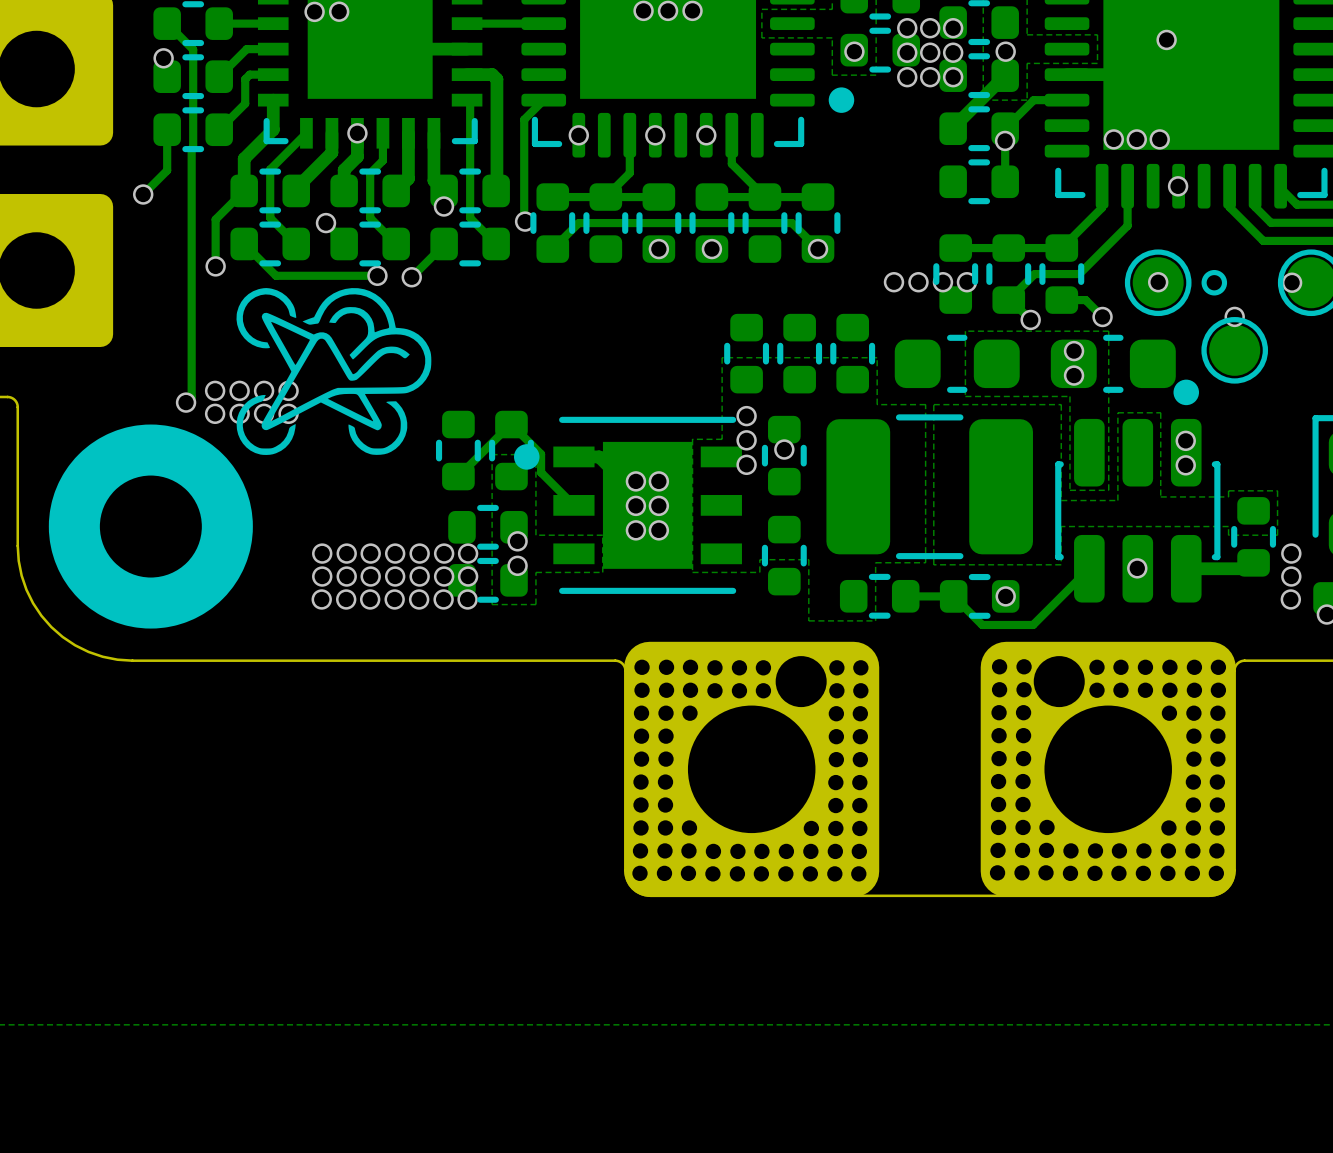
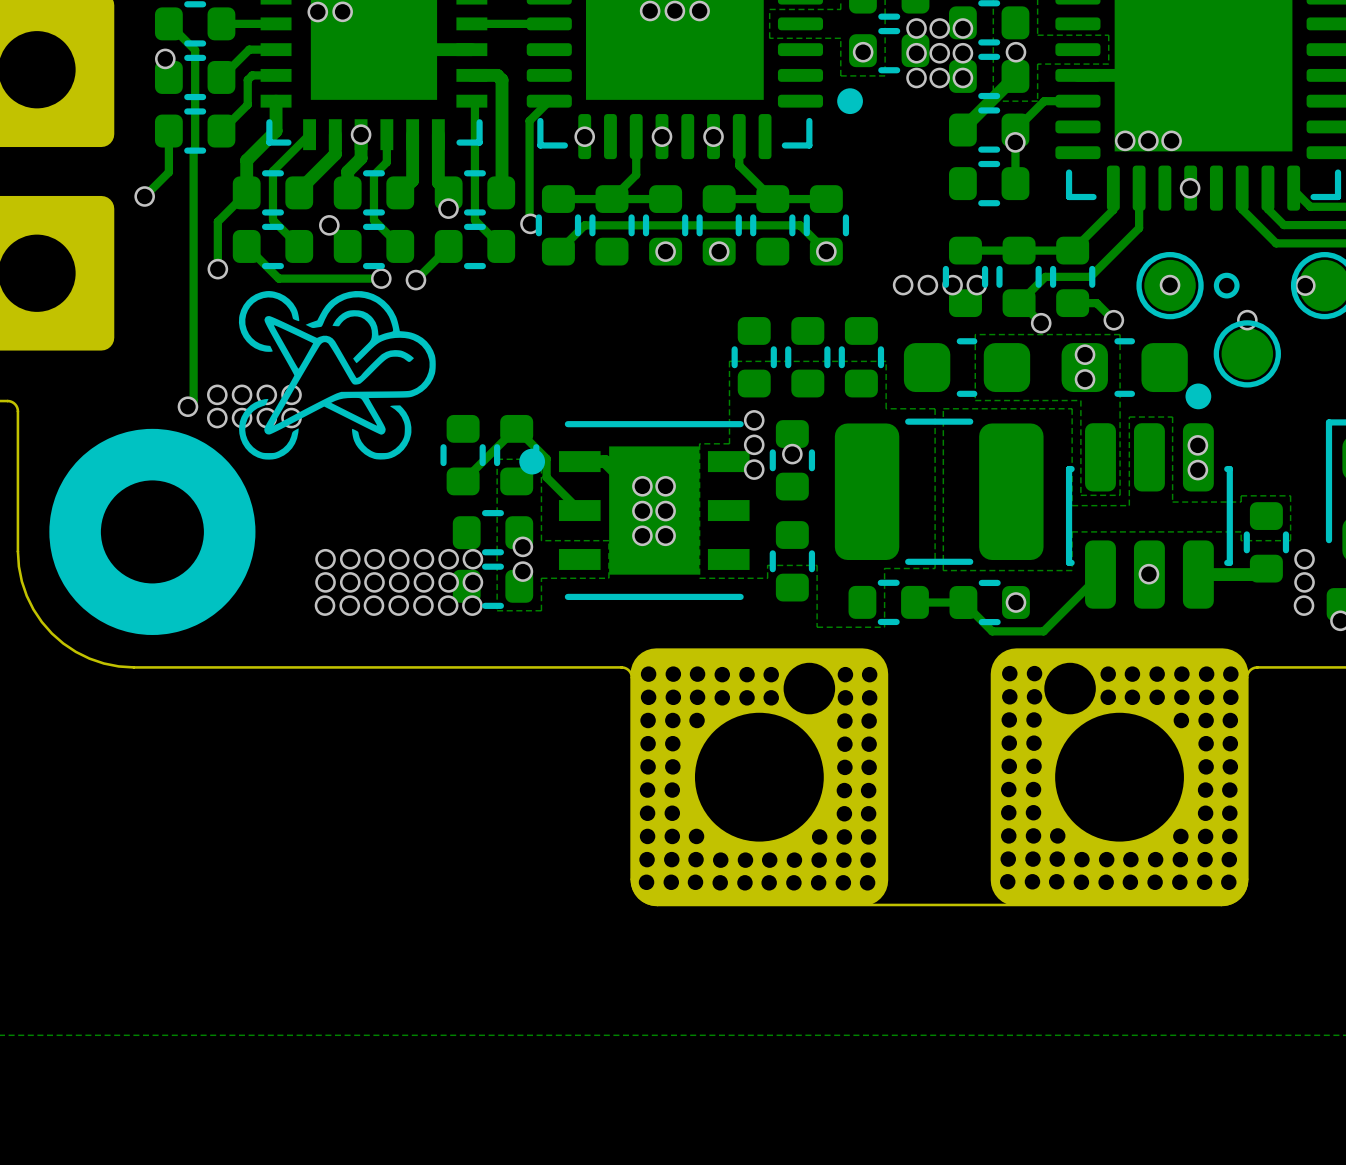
via: (1166, 39) -> none

